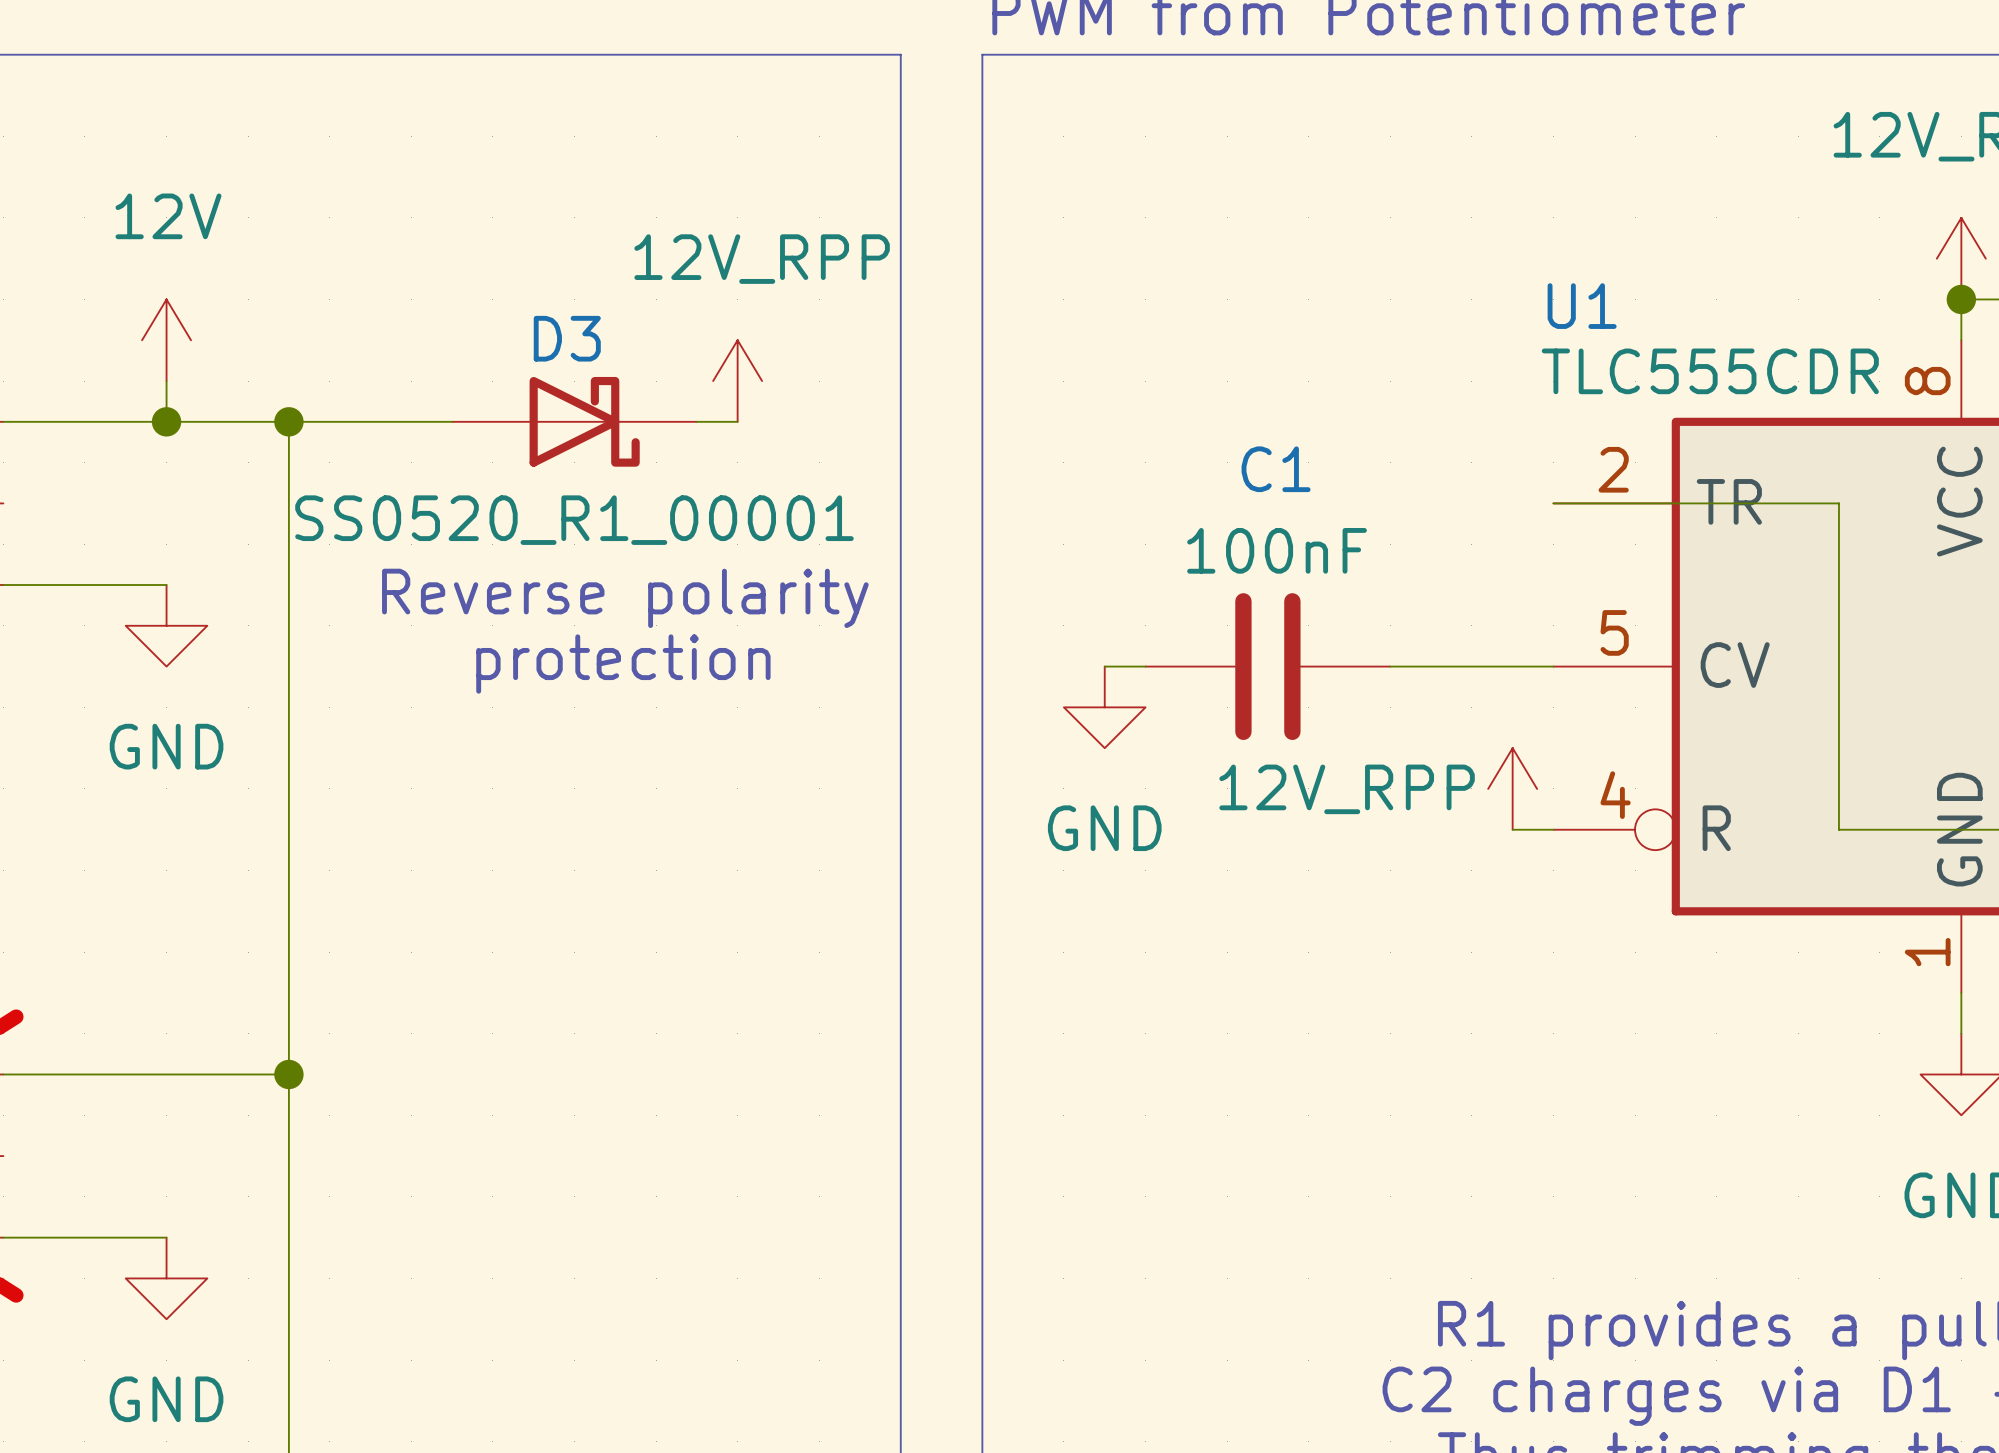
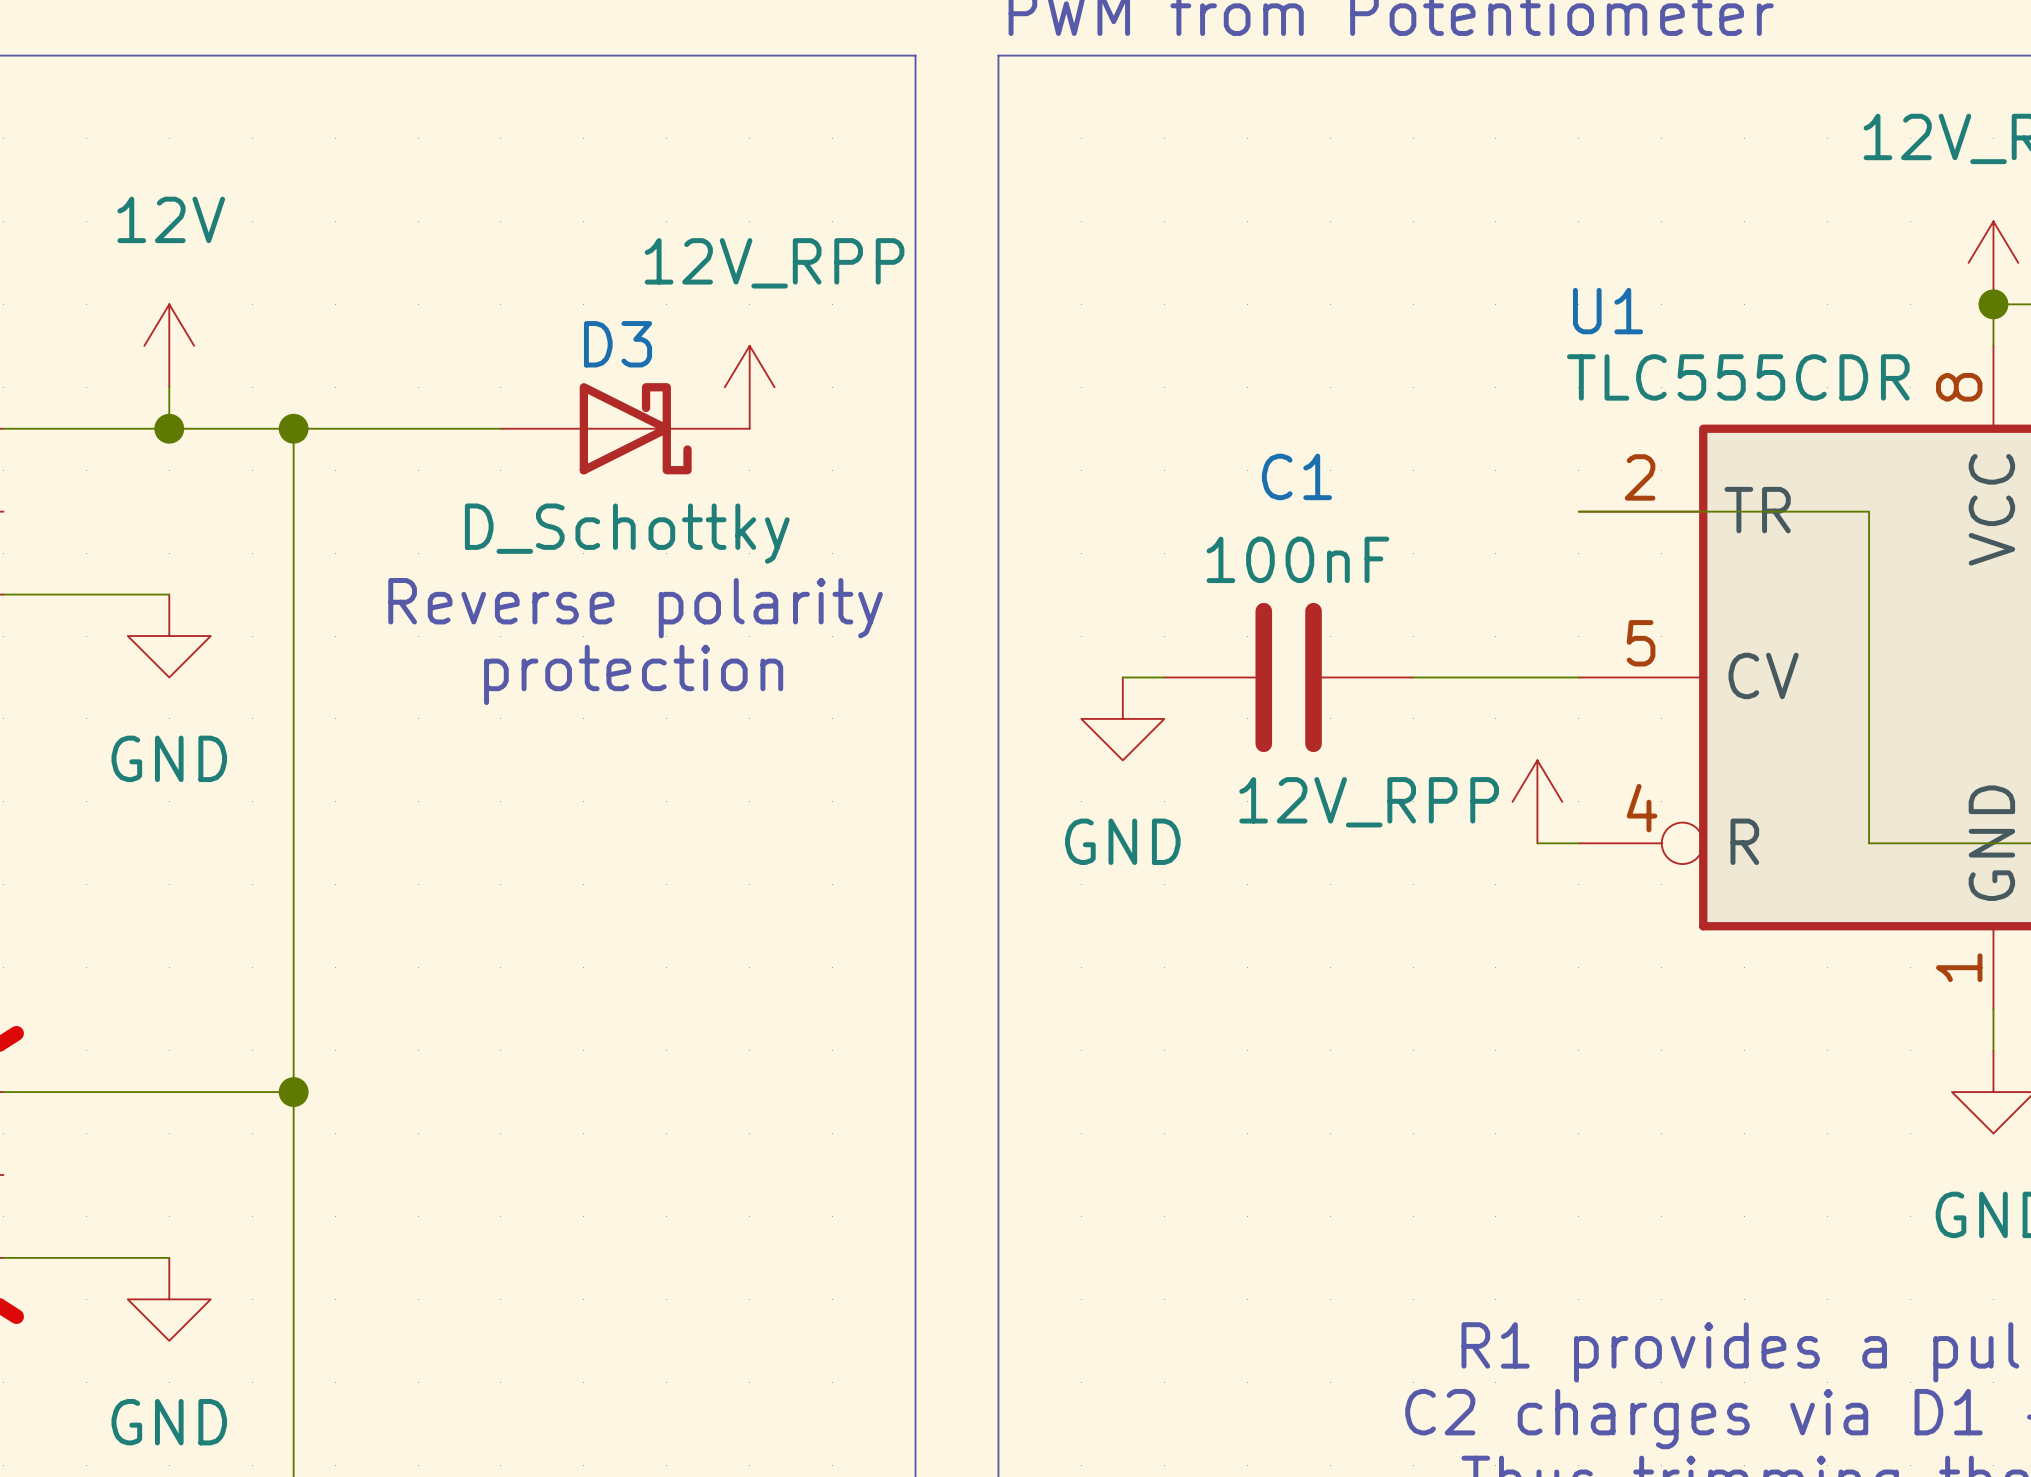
D3 position: (574, 421) -> (625, 428)
D3 value: SS0520_R1_00001 (574, 520) -> D_Schottky (627, 533)

